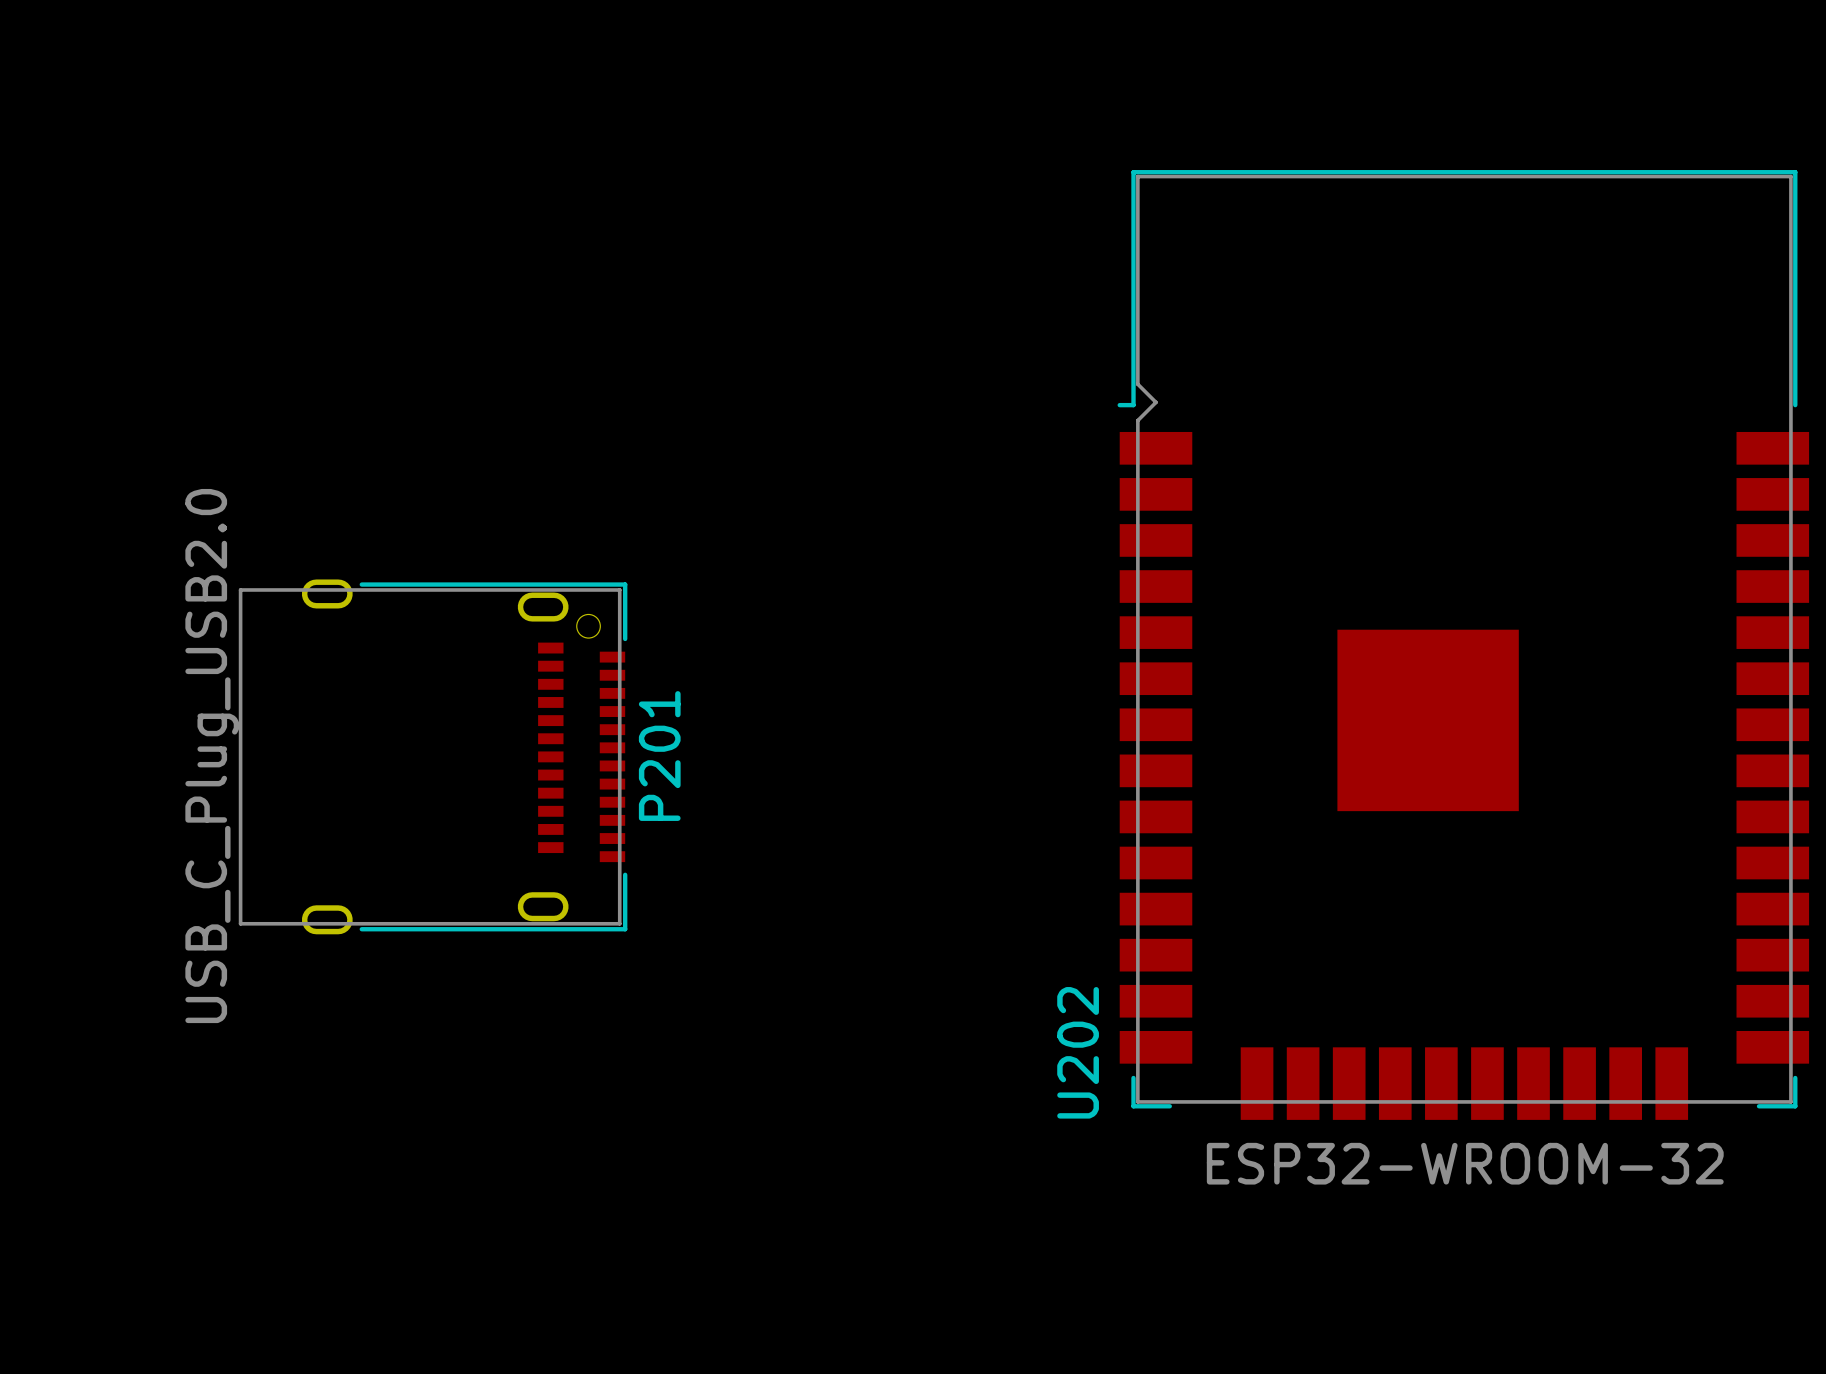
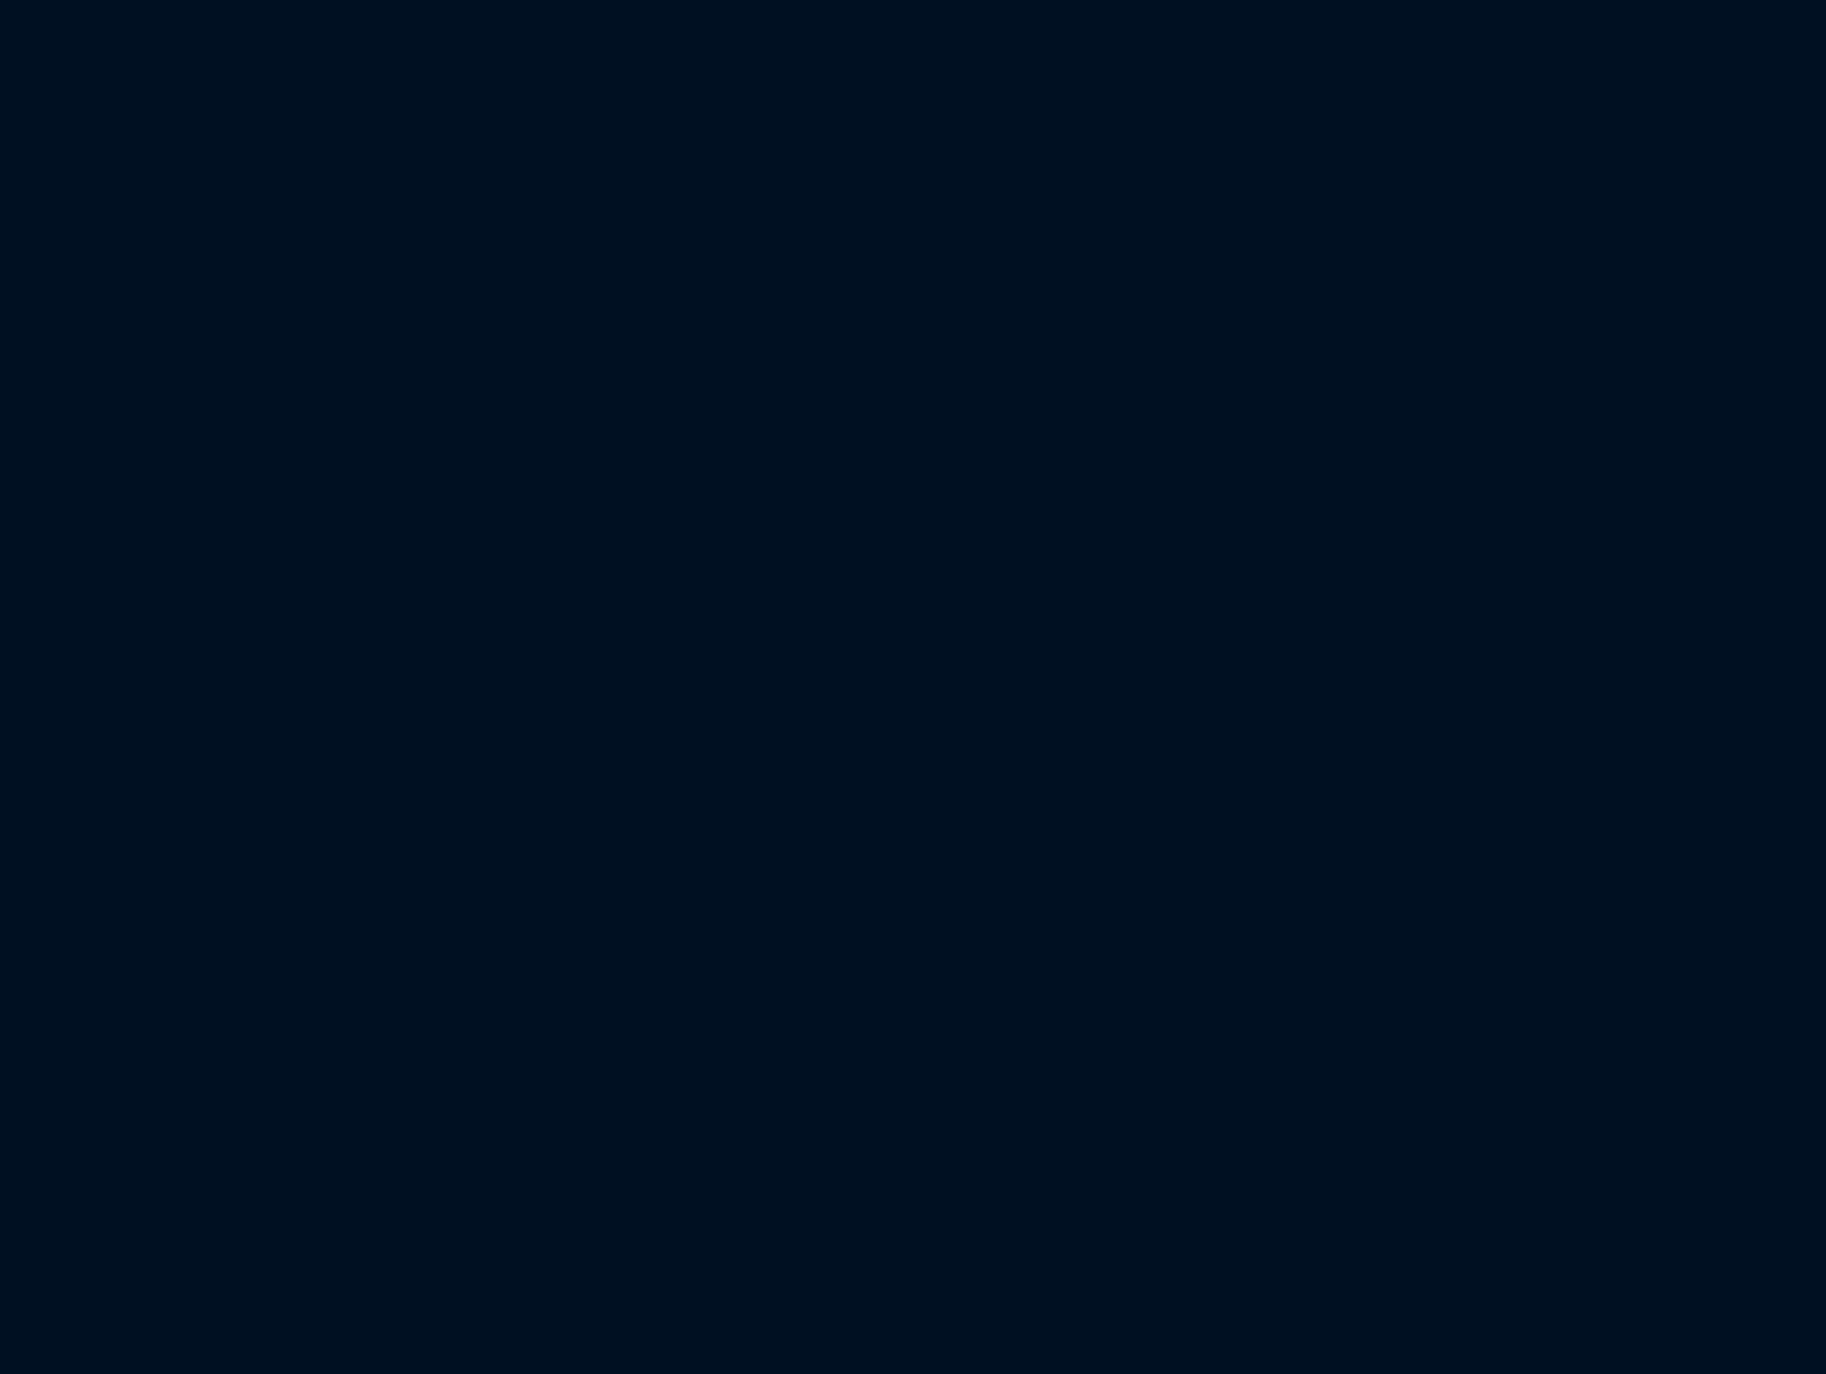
U202: ESP32-WROOM-32 (1463, 644) -> none
P201: USB_C_Plug_USB2.0 (433, 756) -> none

